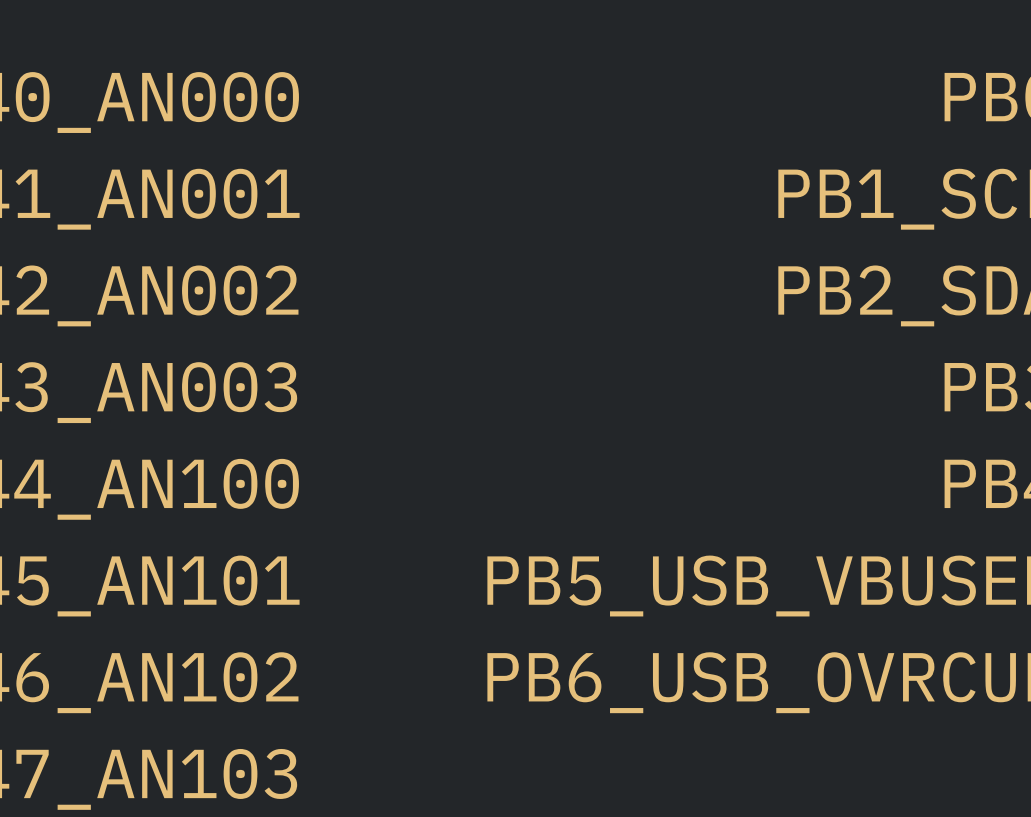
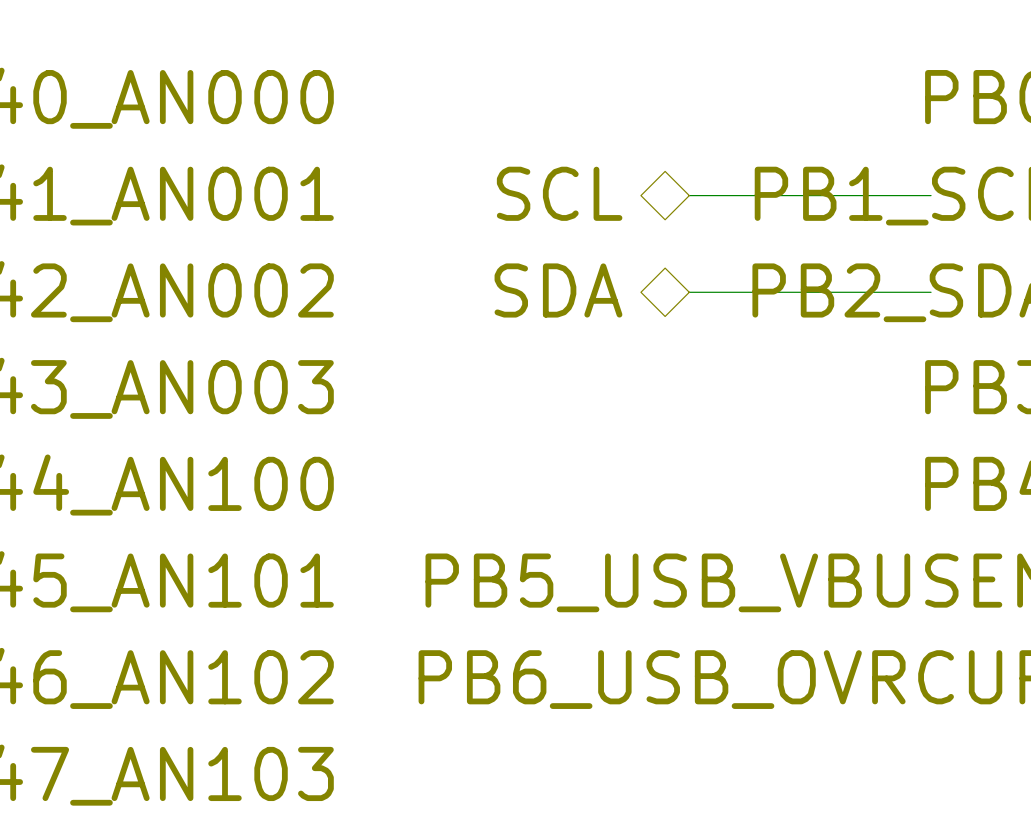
hierarchical label: none -> SCL (559, 193)
wire: none -> (689, 195) (931, 195)
hierarchical label: none -> SDA (558, 290)
wire: none -> (689, 292) (931, 292)

